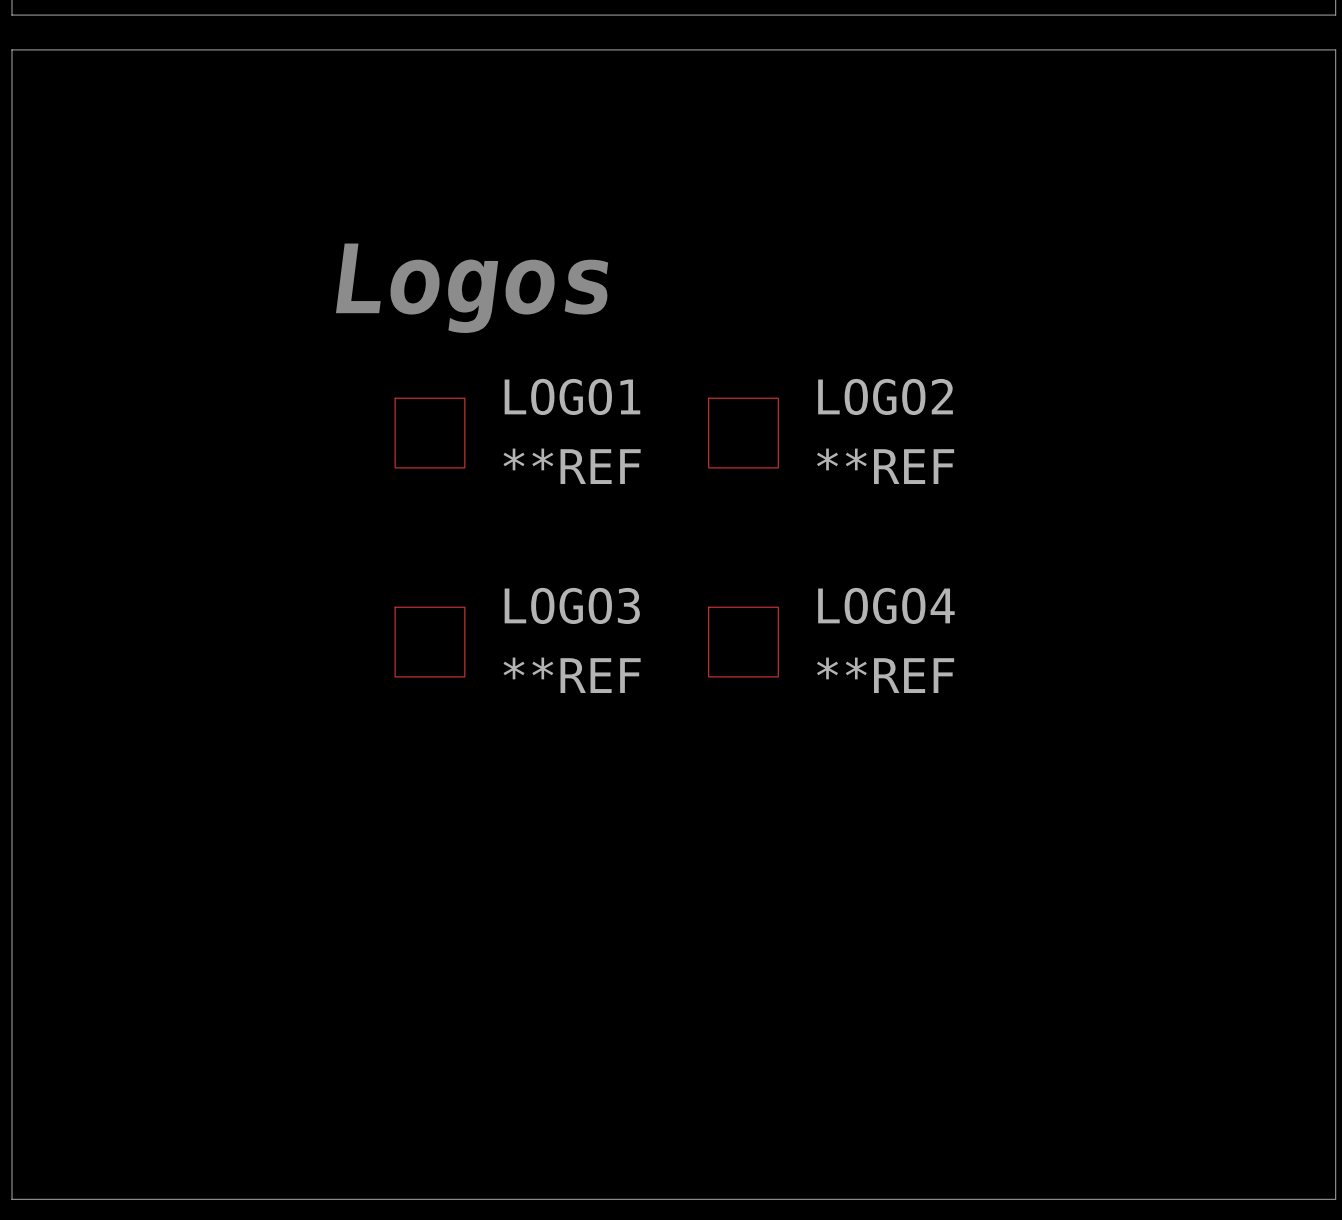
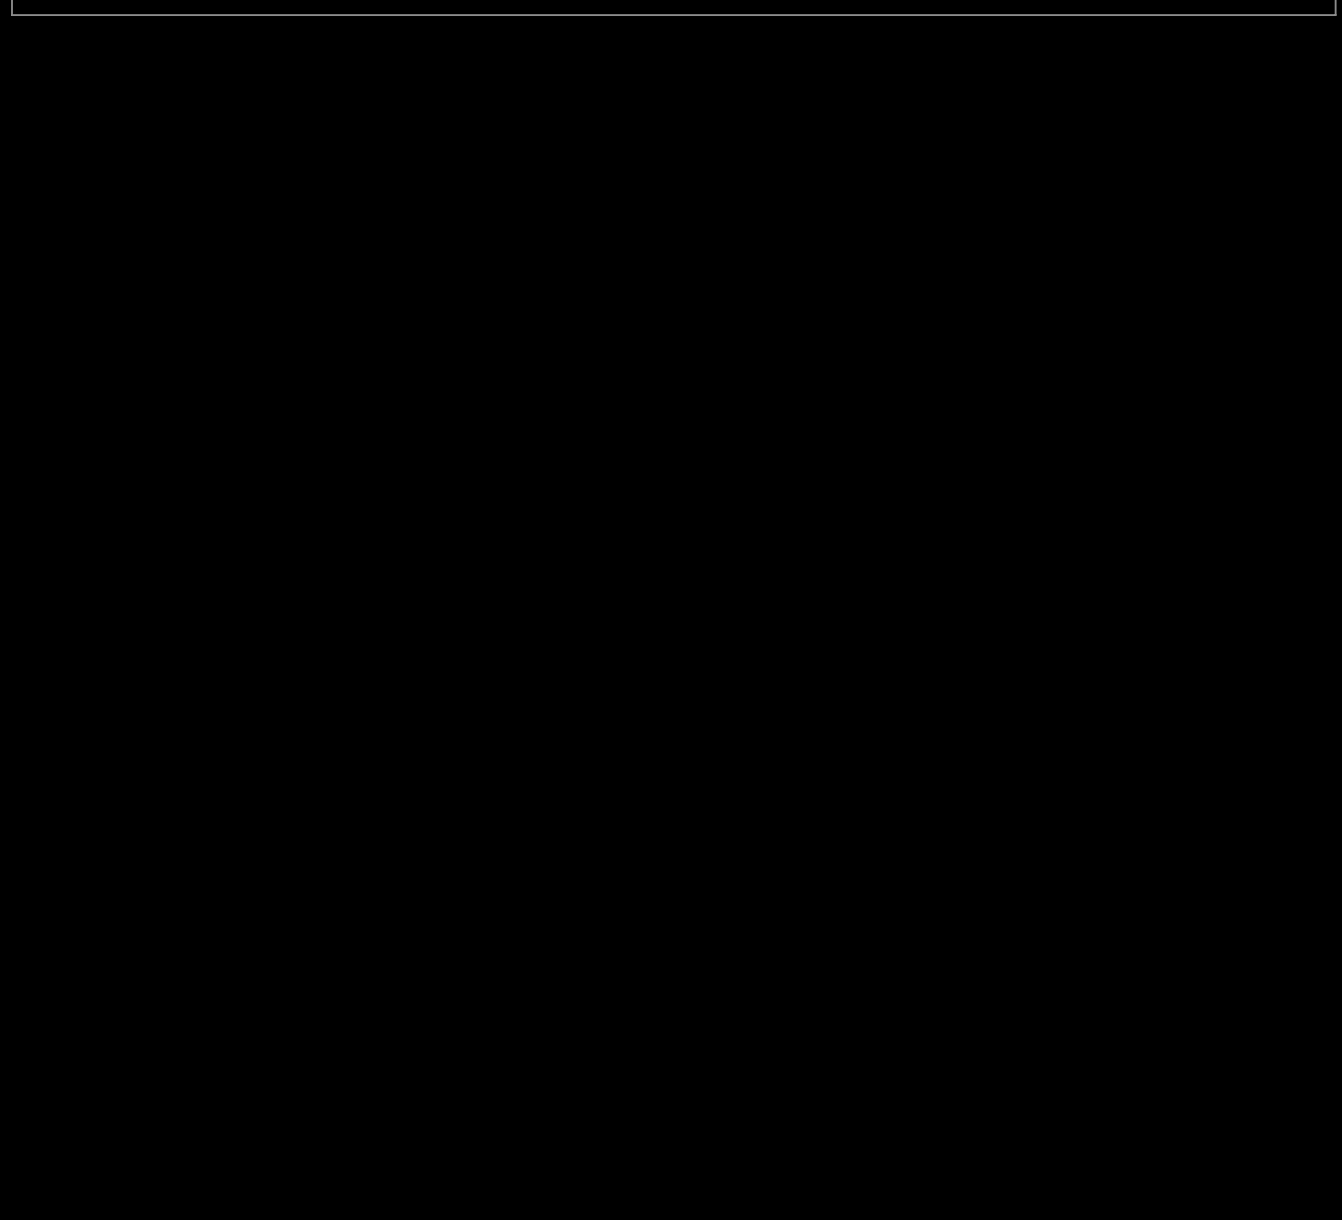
line: (11, 49) (11, 1199) (1335, 1199) (1335, 49) (11, 49) -> none
text: Logos (472, 288) -> none
LOGO1: **REF (429, 433) -> none
LOGO2: **REF (743, 433) -> none
LOGO3: **REF (429, 642) -> none
LOGO4: **REF (743, 642) -> none

